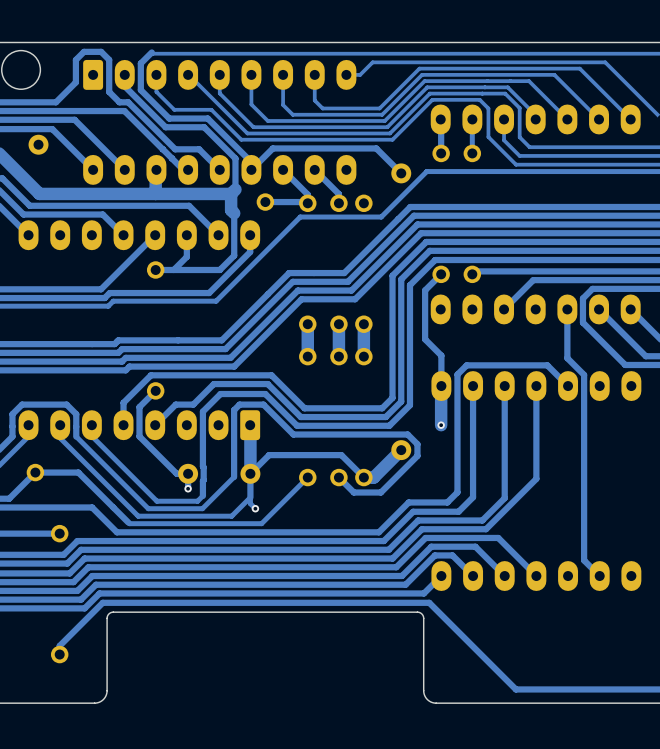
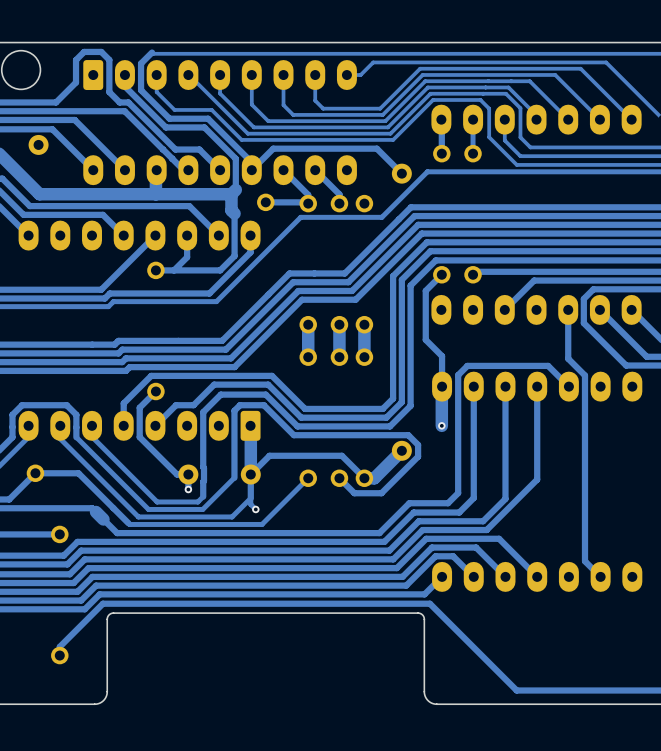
track width: thin (95, 511) (103, 518) -> thick (96, 511) (103, 519)

